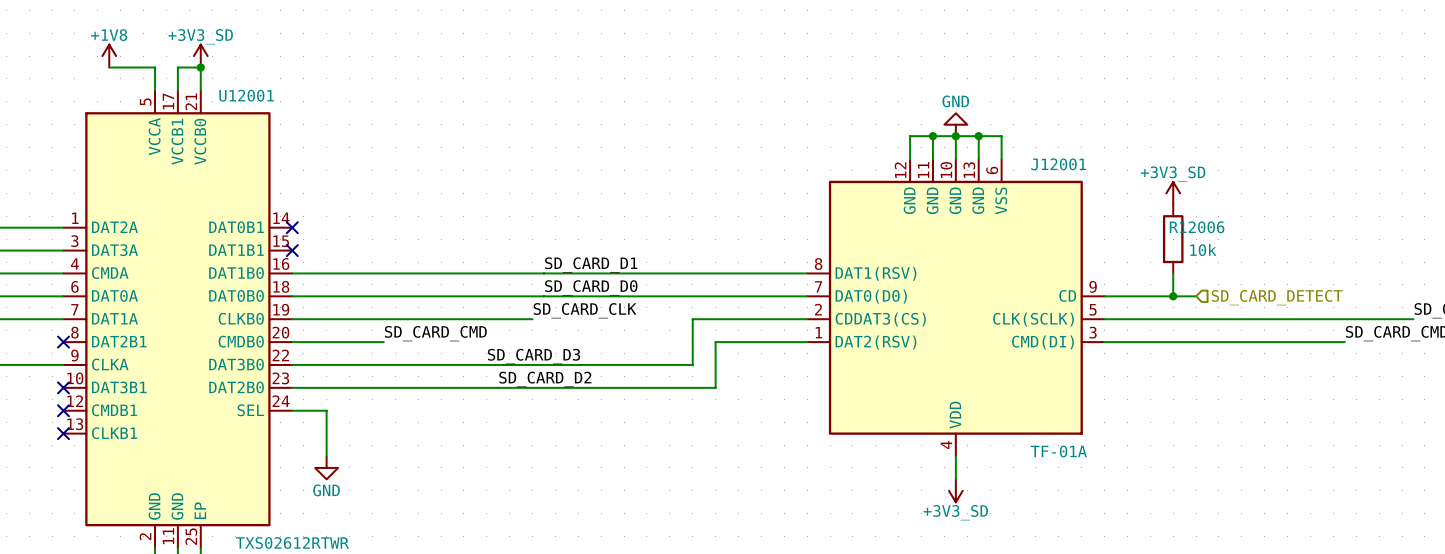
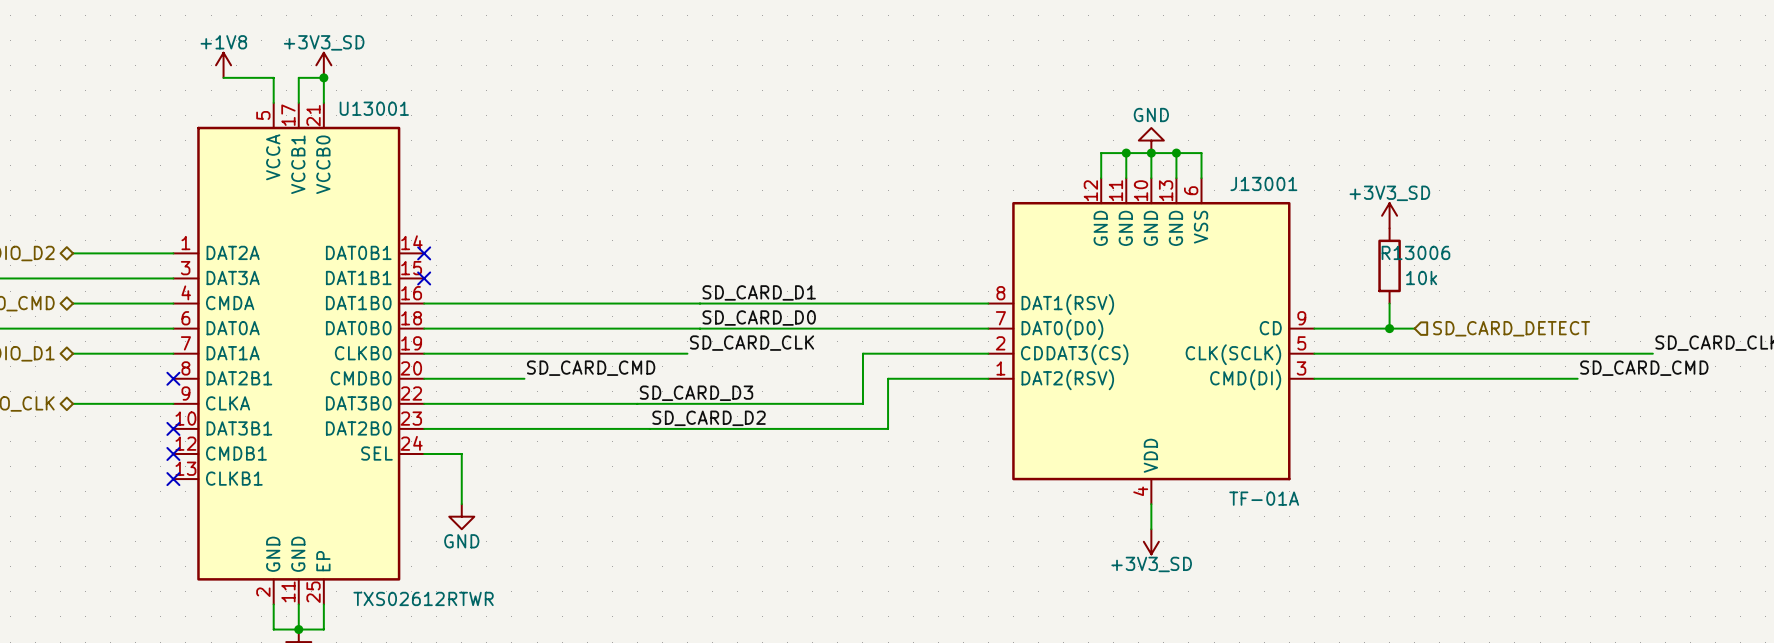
U12001 name: U12001 (246, 95) -> U13001 (374, 108)
J12001 name: J12001 (1058, 164) -> J13001 (1263, 183)
R12006 name: R12006 (1197, 227) -> R13006 (1415, 252)

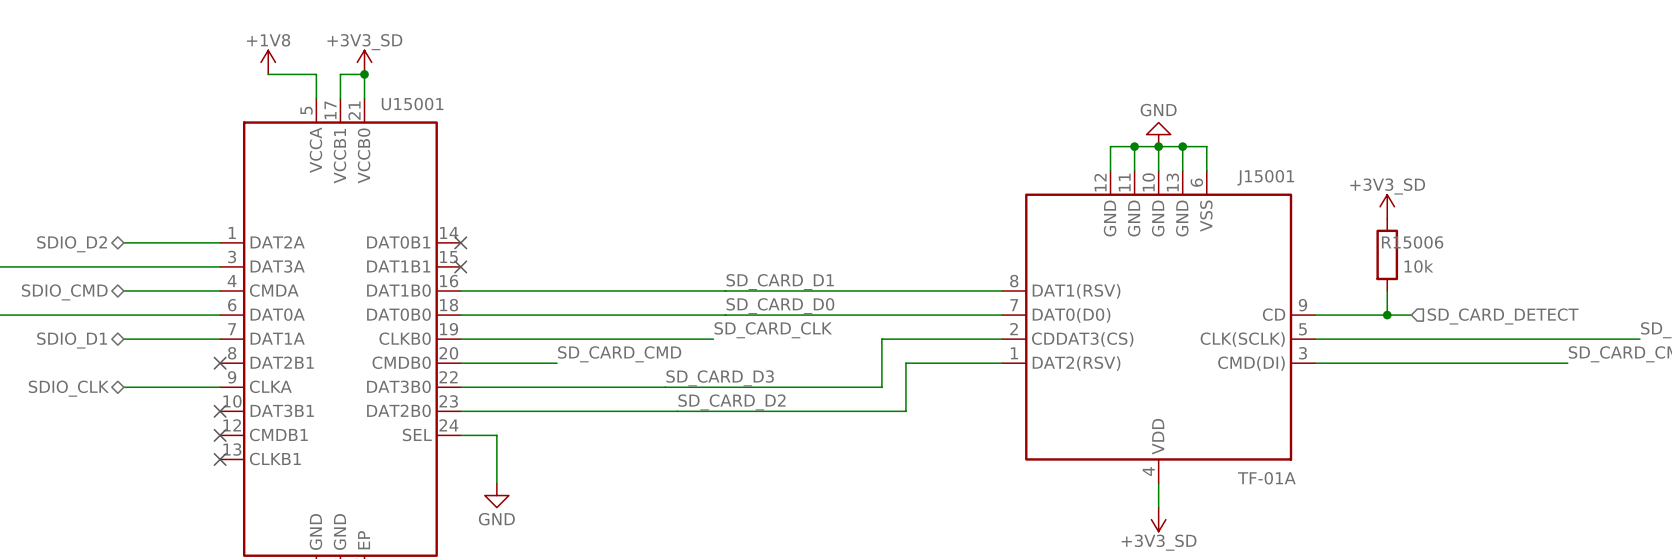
U13001 name: U13001 (374, 108) -> U15001 (412, 104)
J13001 name: J13001 (1263, 183) -> J15001 (1265, 177)
R13006 name: R13006 (1415, 252) -> R15006 (1412, 242)

